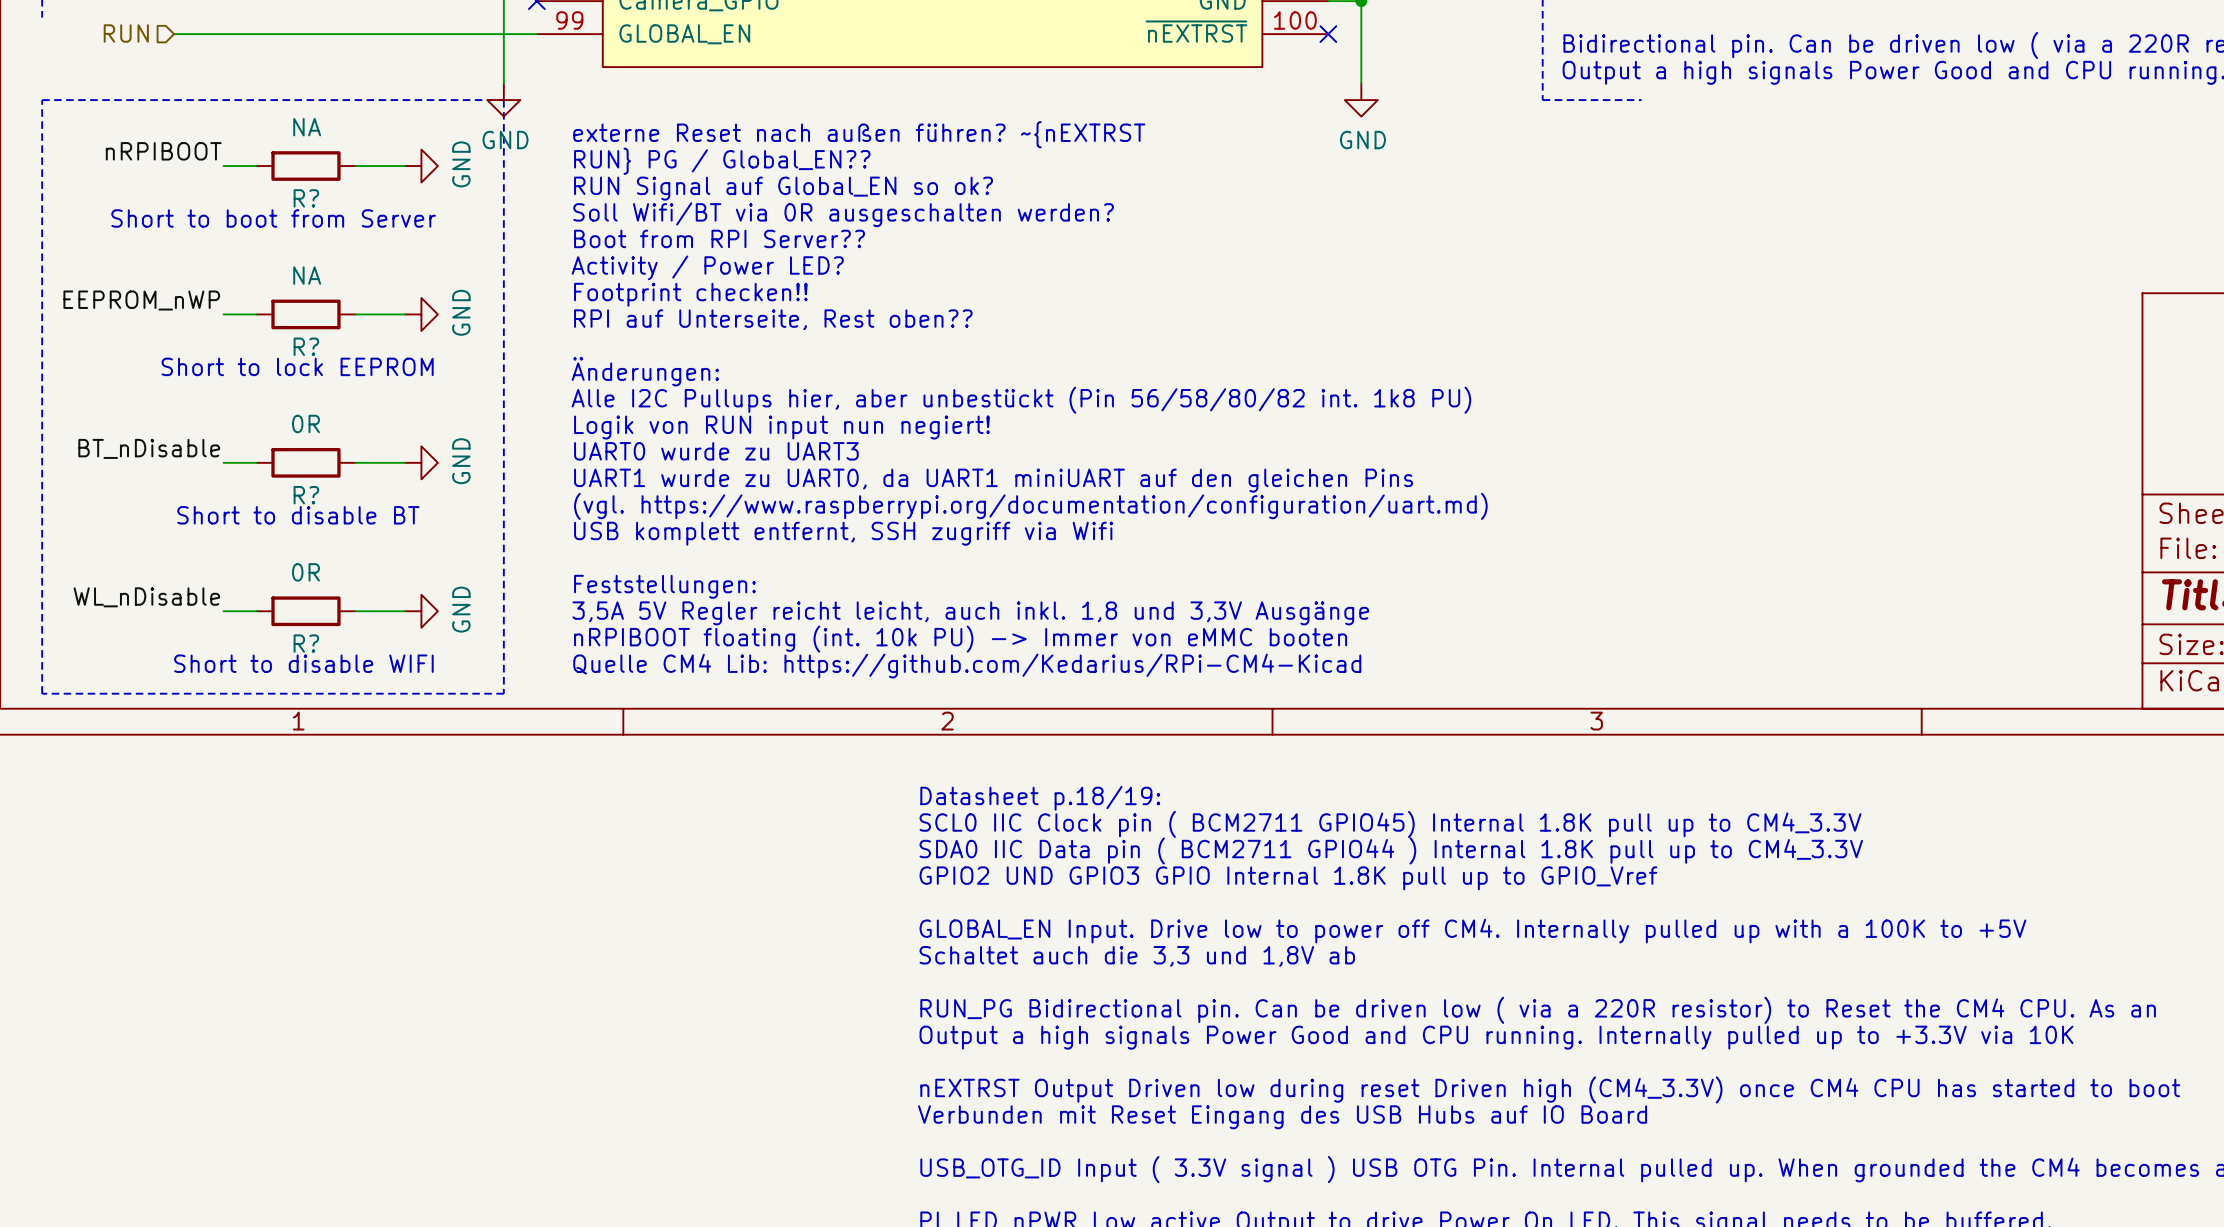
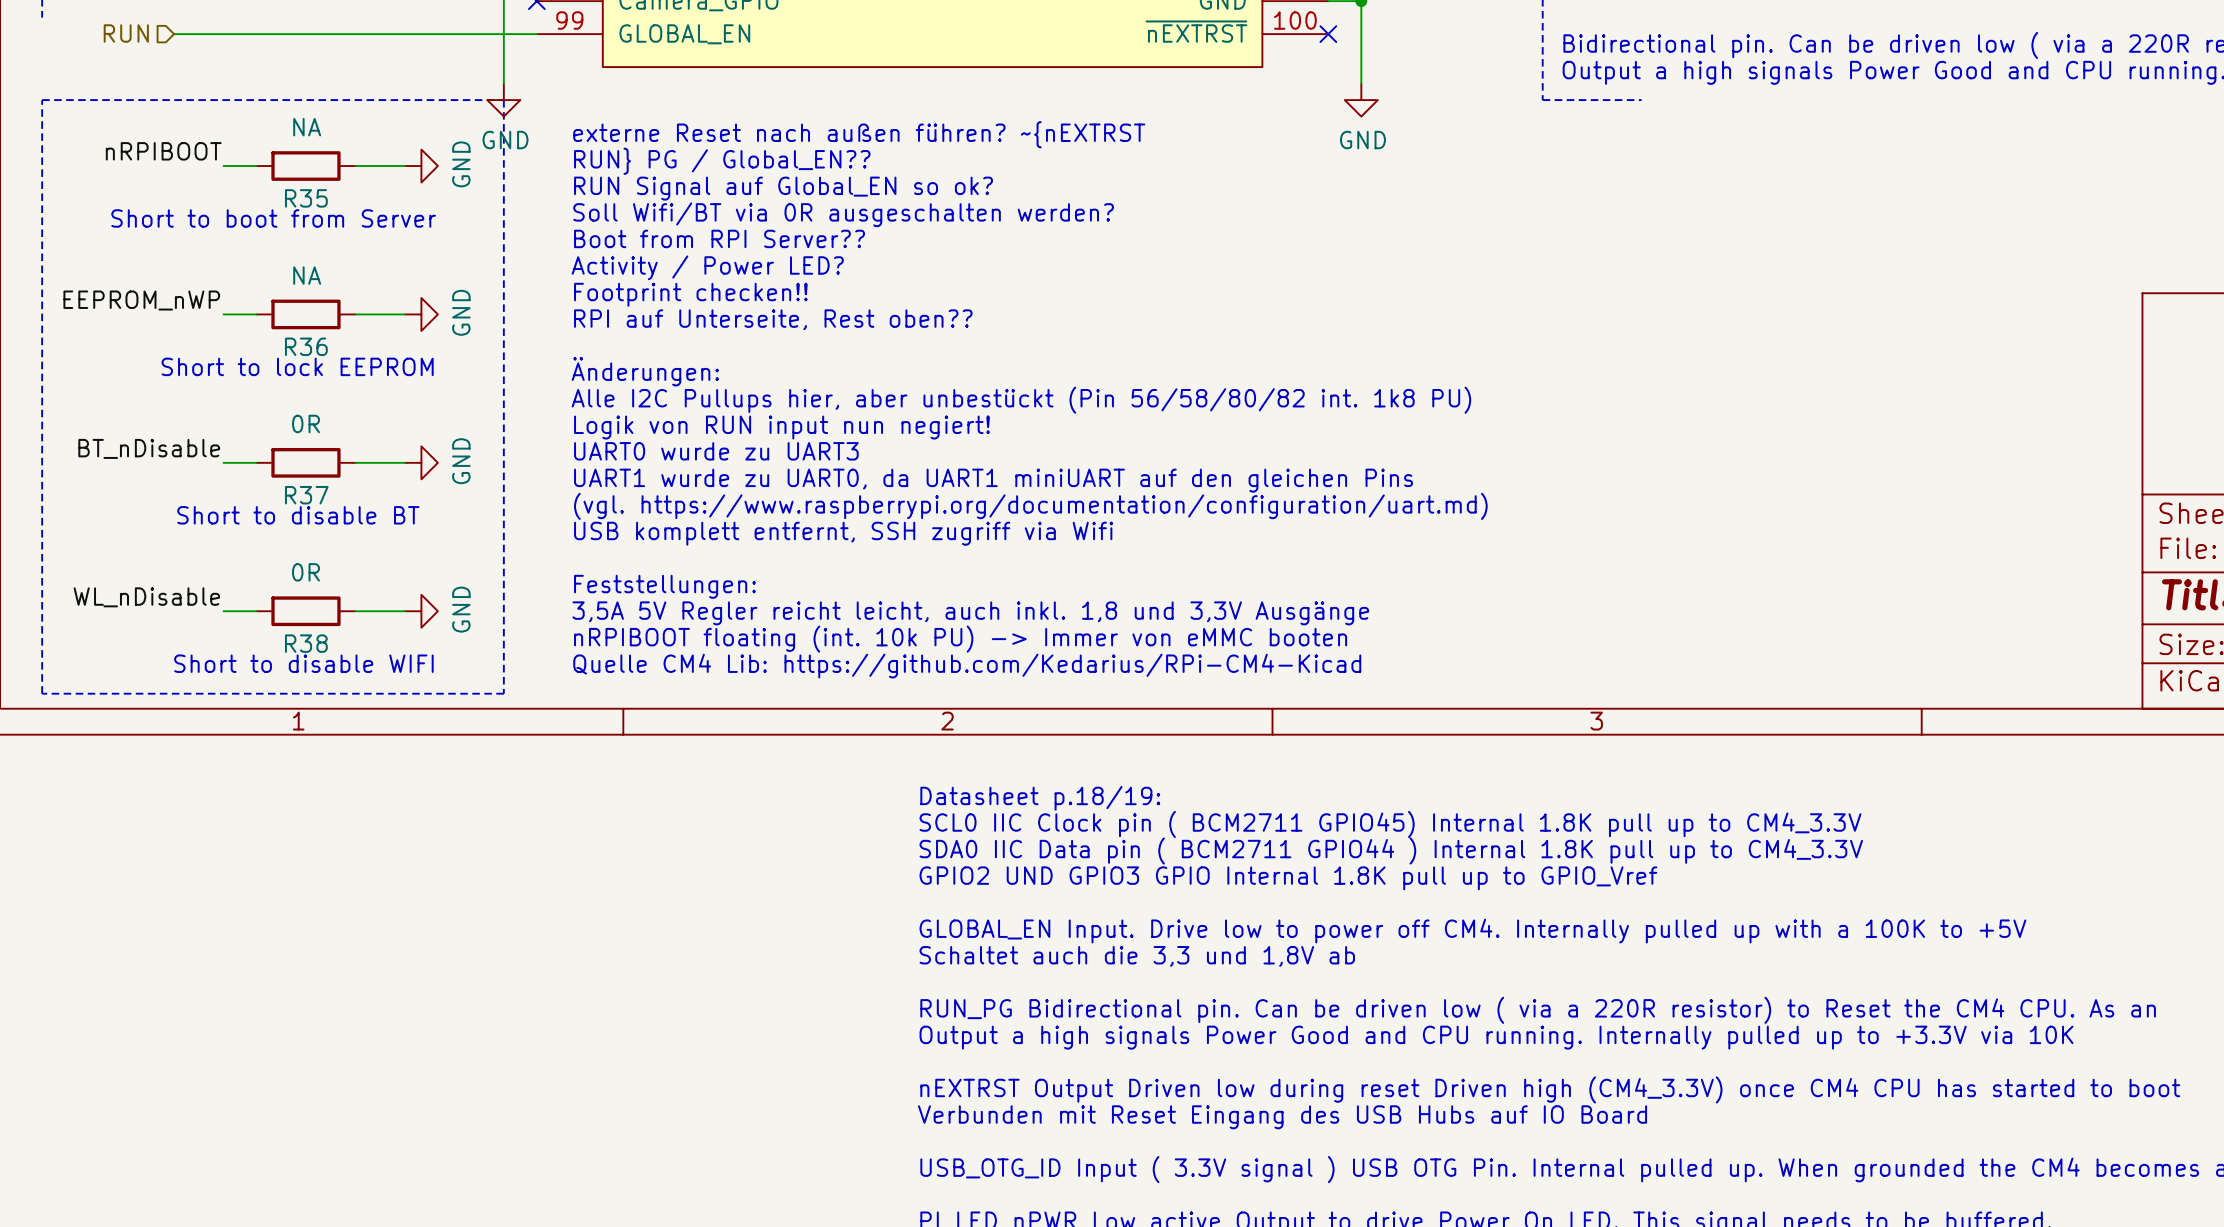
R? name: R? (306, 198) -> R35 (306, 198)
R? name: R? (306, 346) -> R36 (306, 346)
R? name: R? (306, 495) -> R37 (306, 495)
R? name: R? (306, 643) -> R38 (306, 643)

